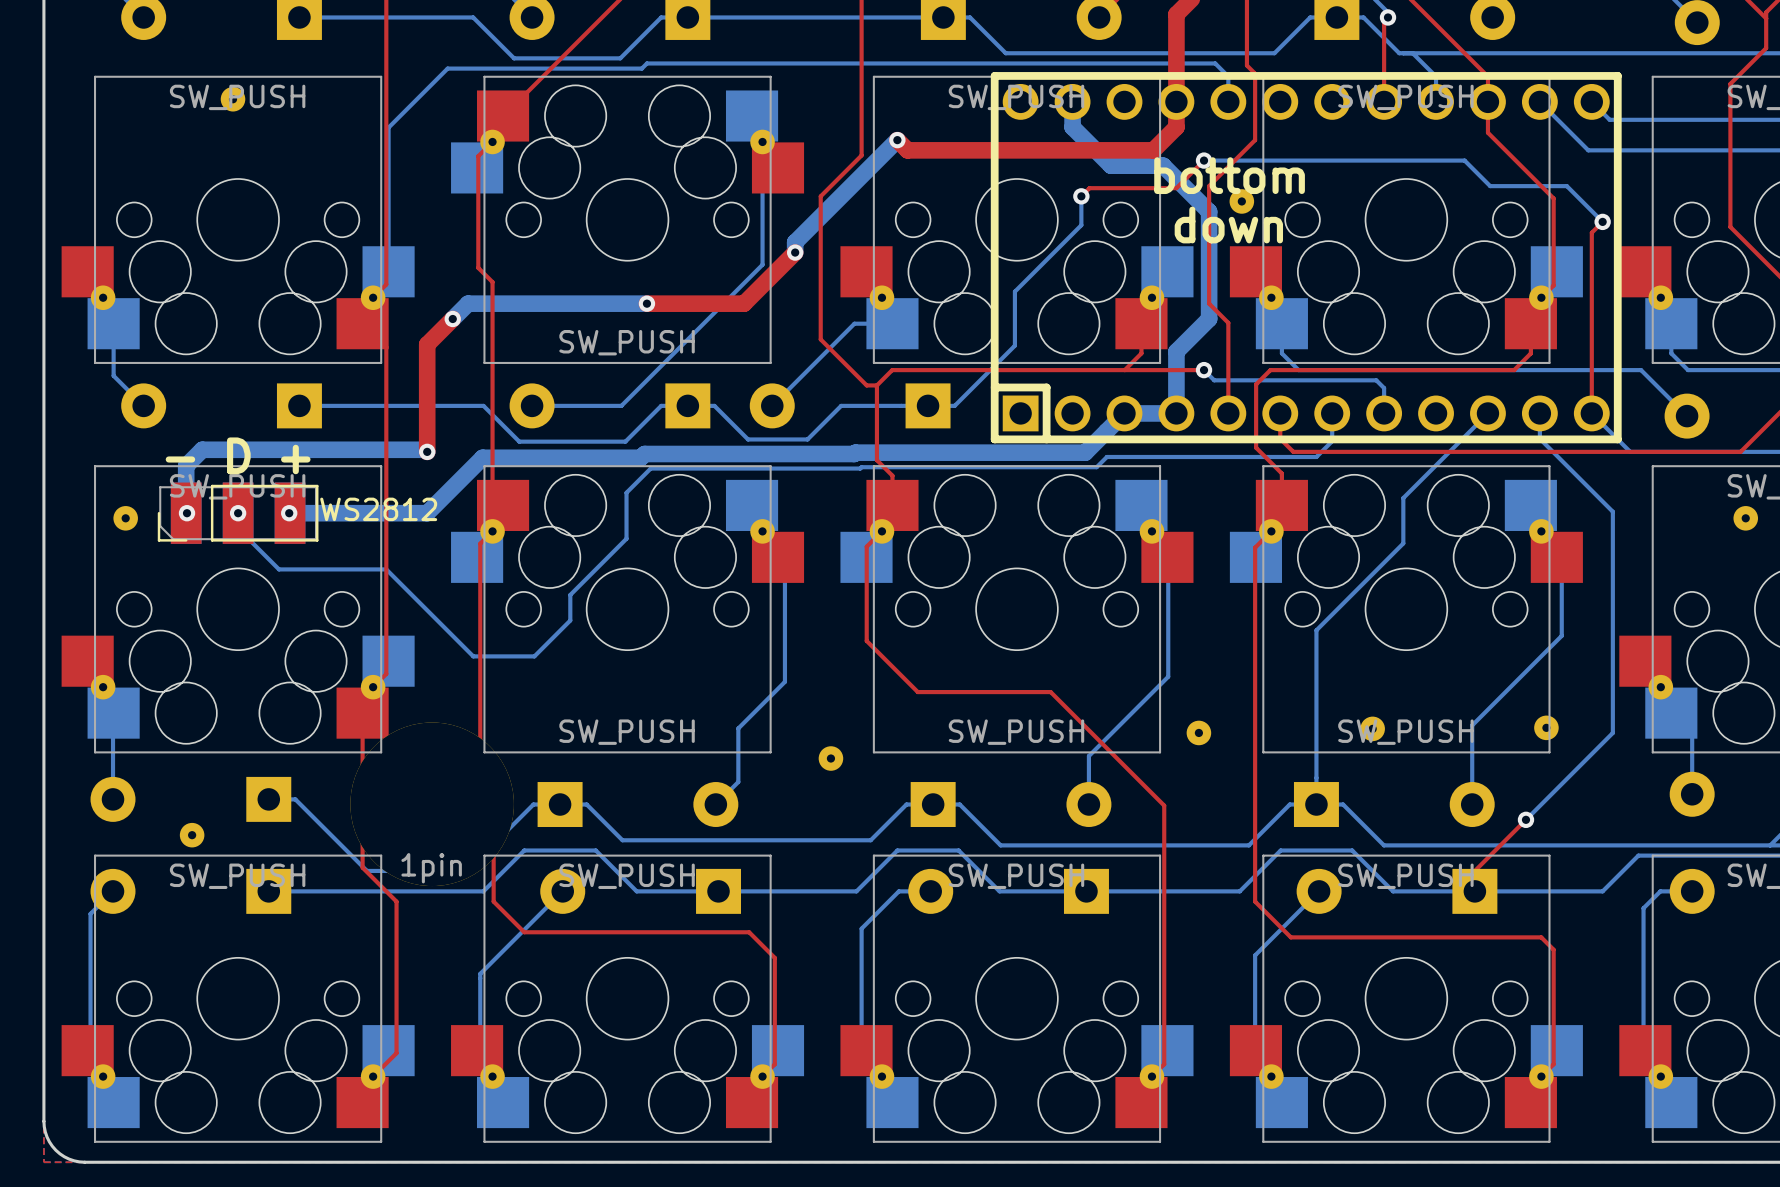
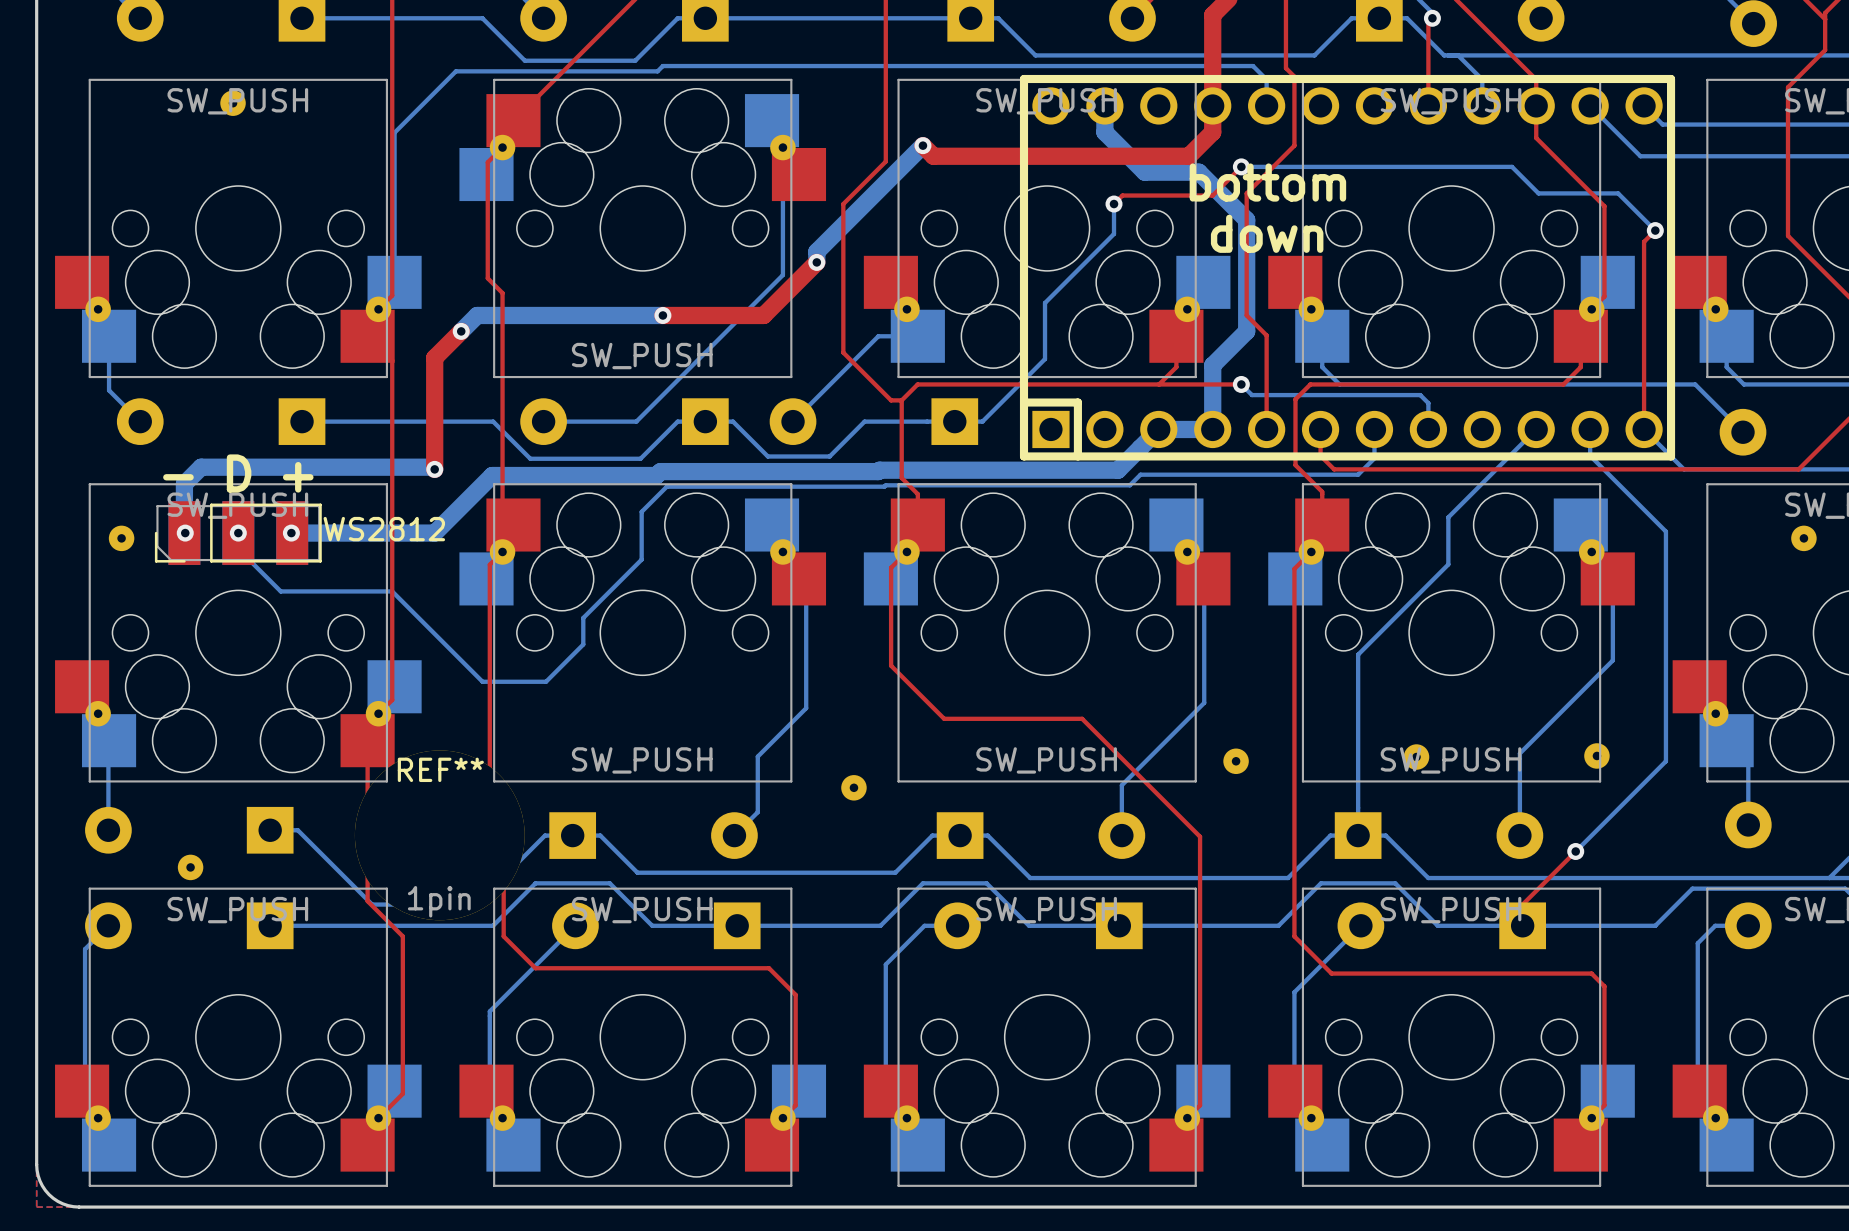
part: (1241, 201) -> none
REF** name: none -> REF** (440, 769)

